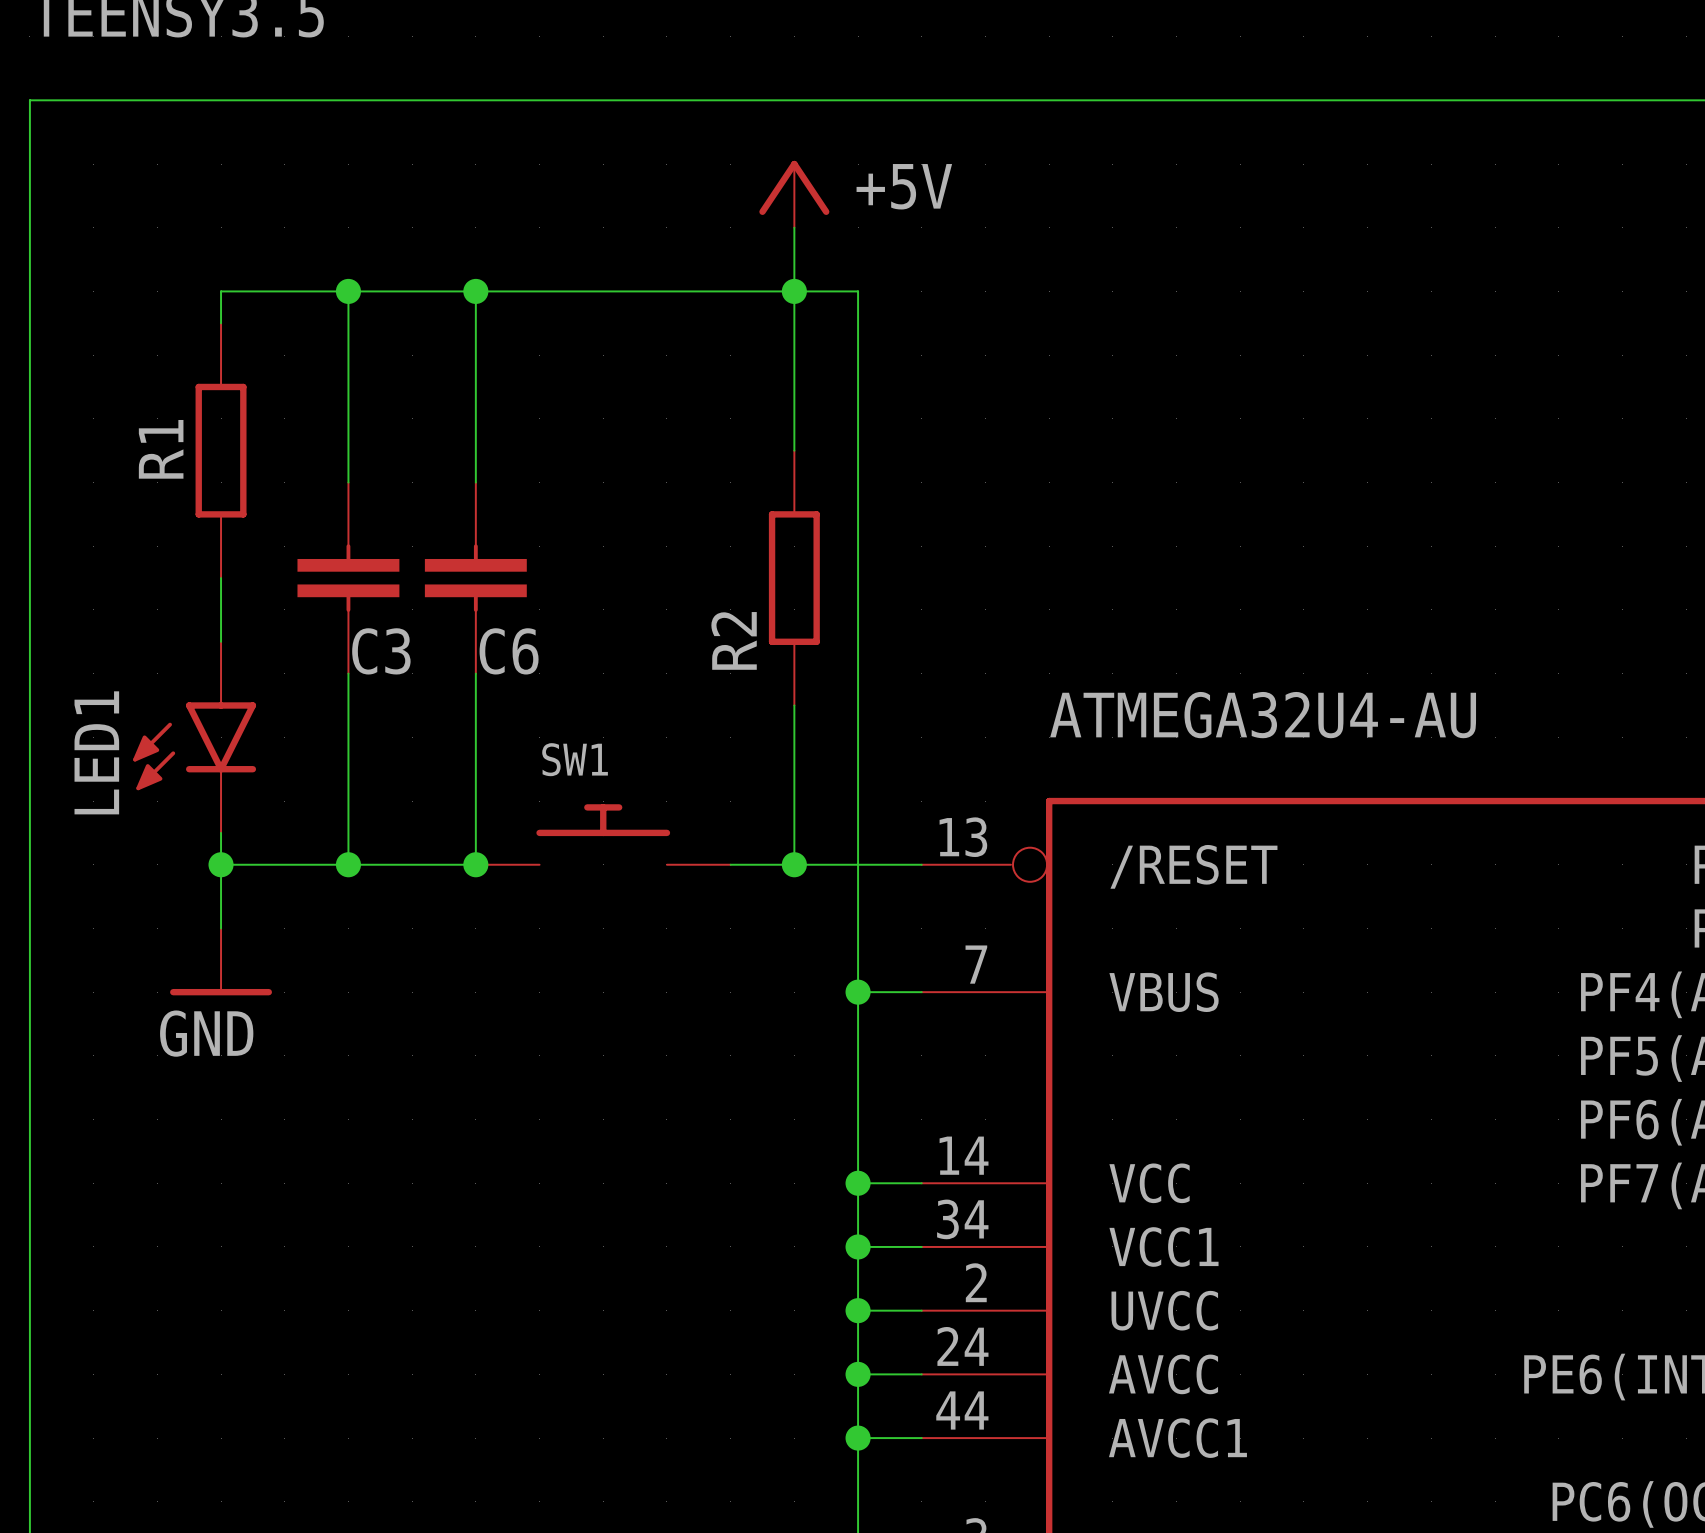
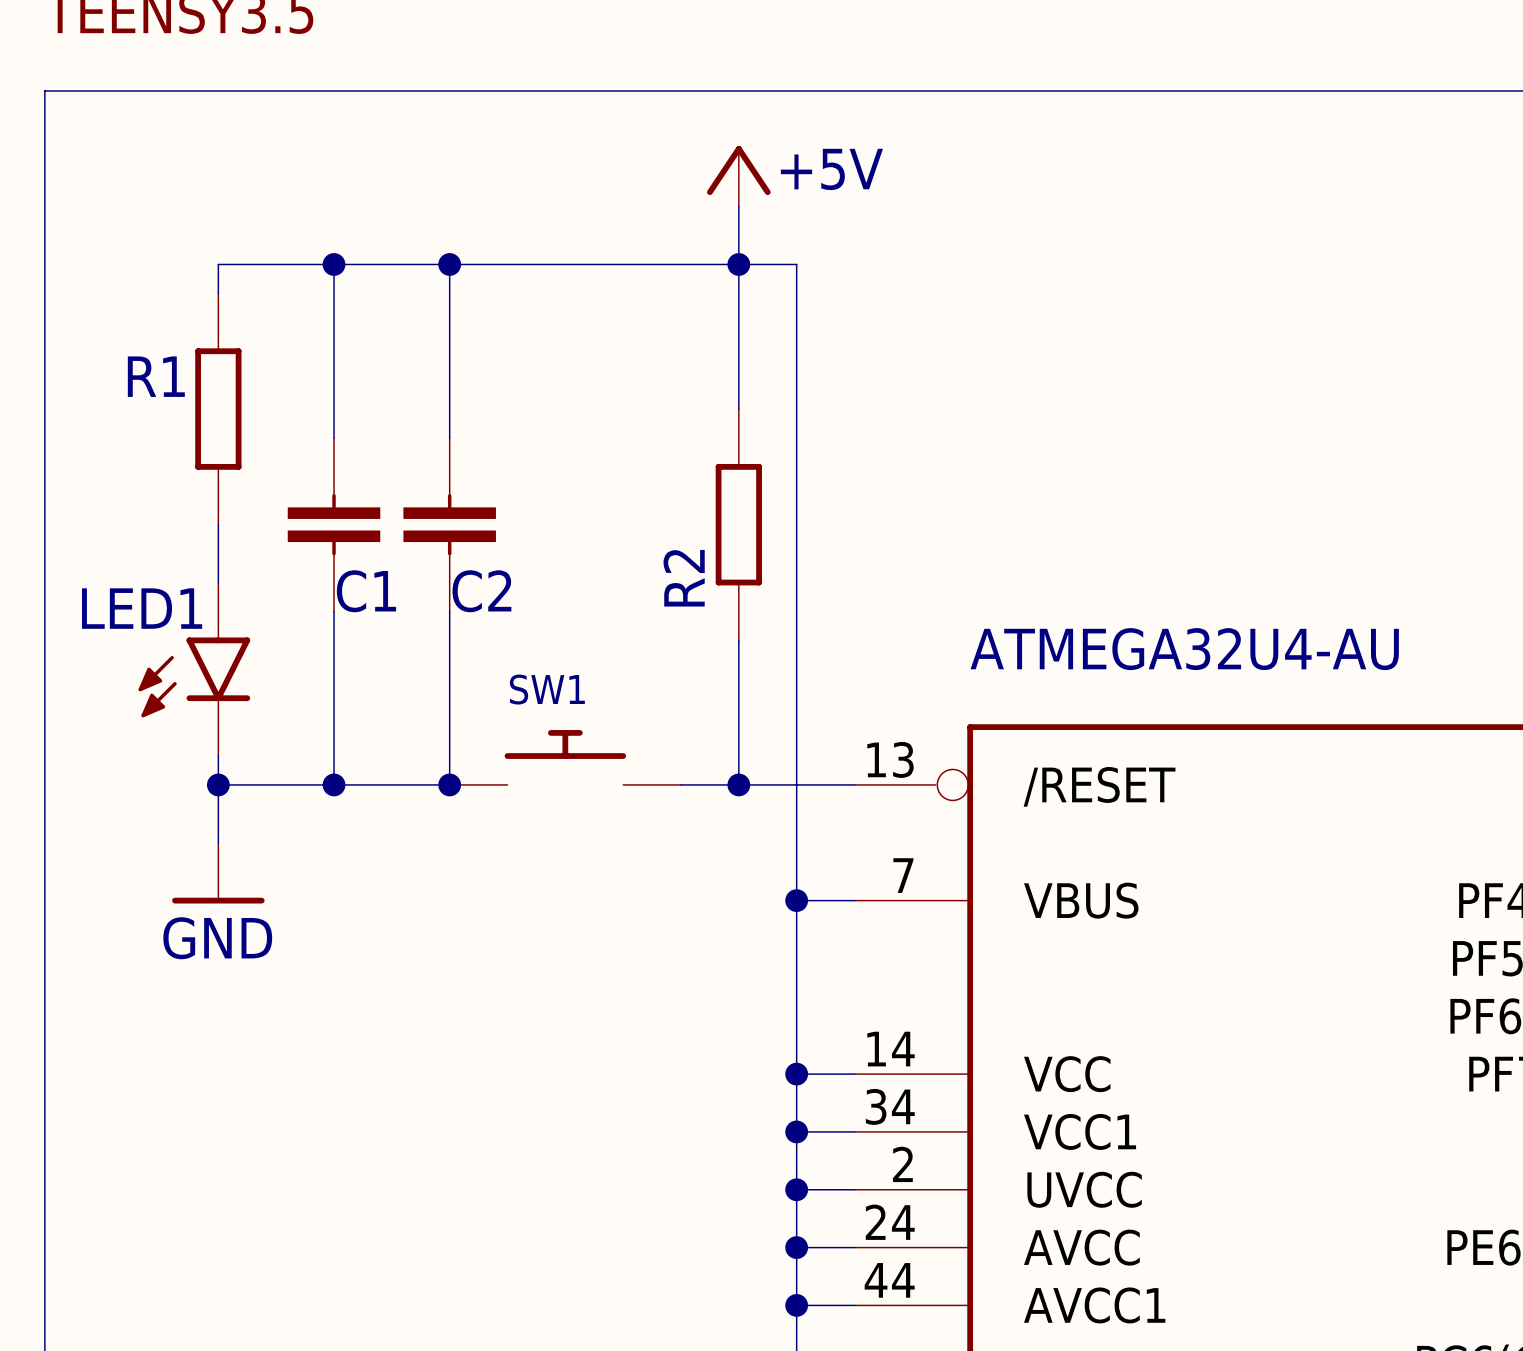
R1 name rotation: 0° (161, 449) -> 90° clockwise (156, 376)
C3 name: C3 (381, 651) -> C1 (366, 591)
C6 name: C6 (509, 651) -> C2 (481, 591)
LED1 name rotation: 0° (96, 752) -> 90° clockwise (142, 608)

